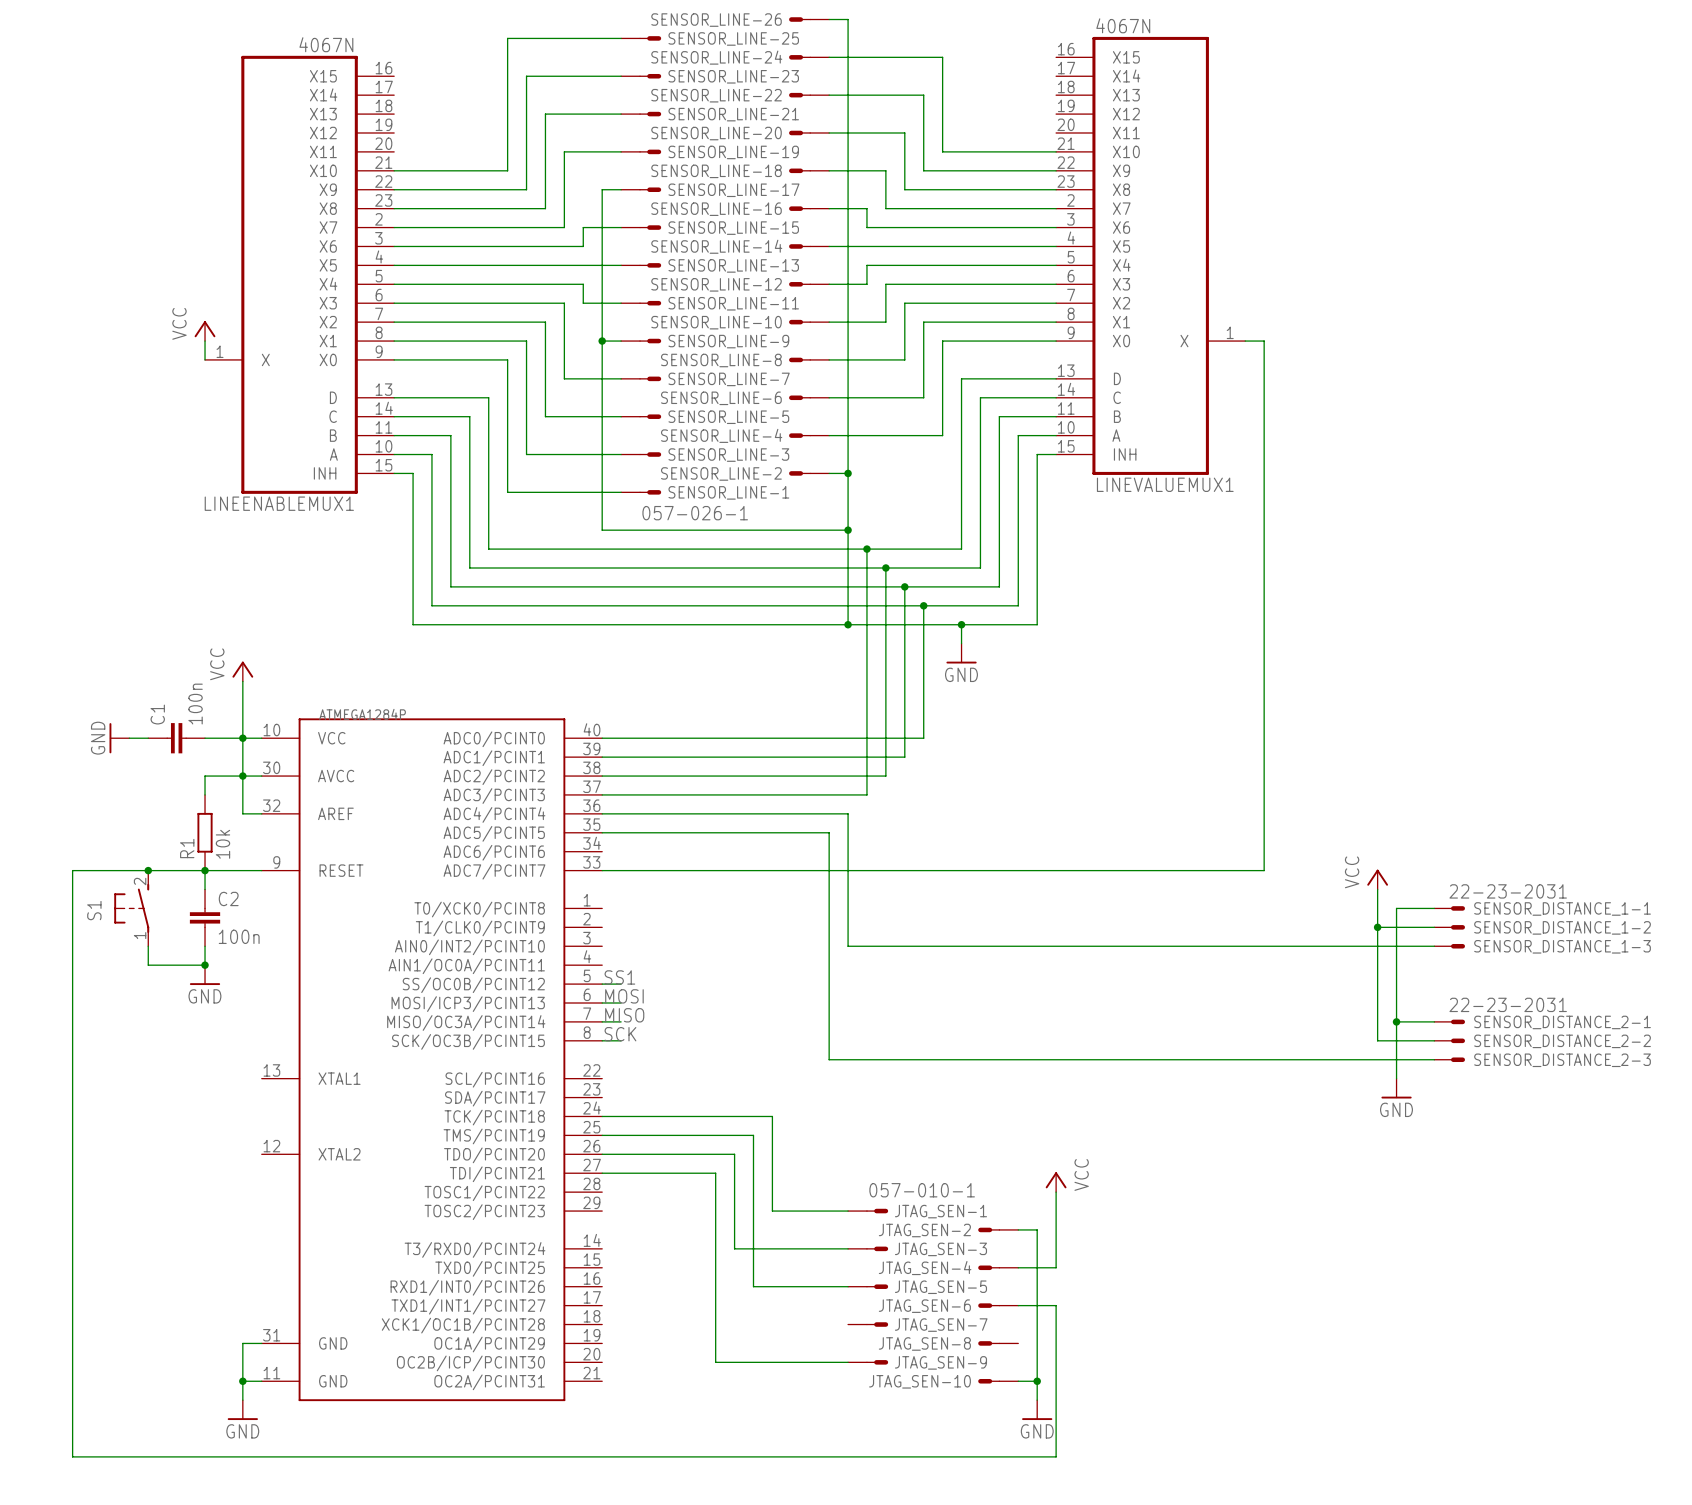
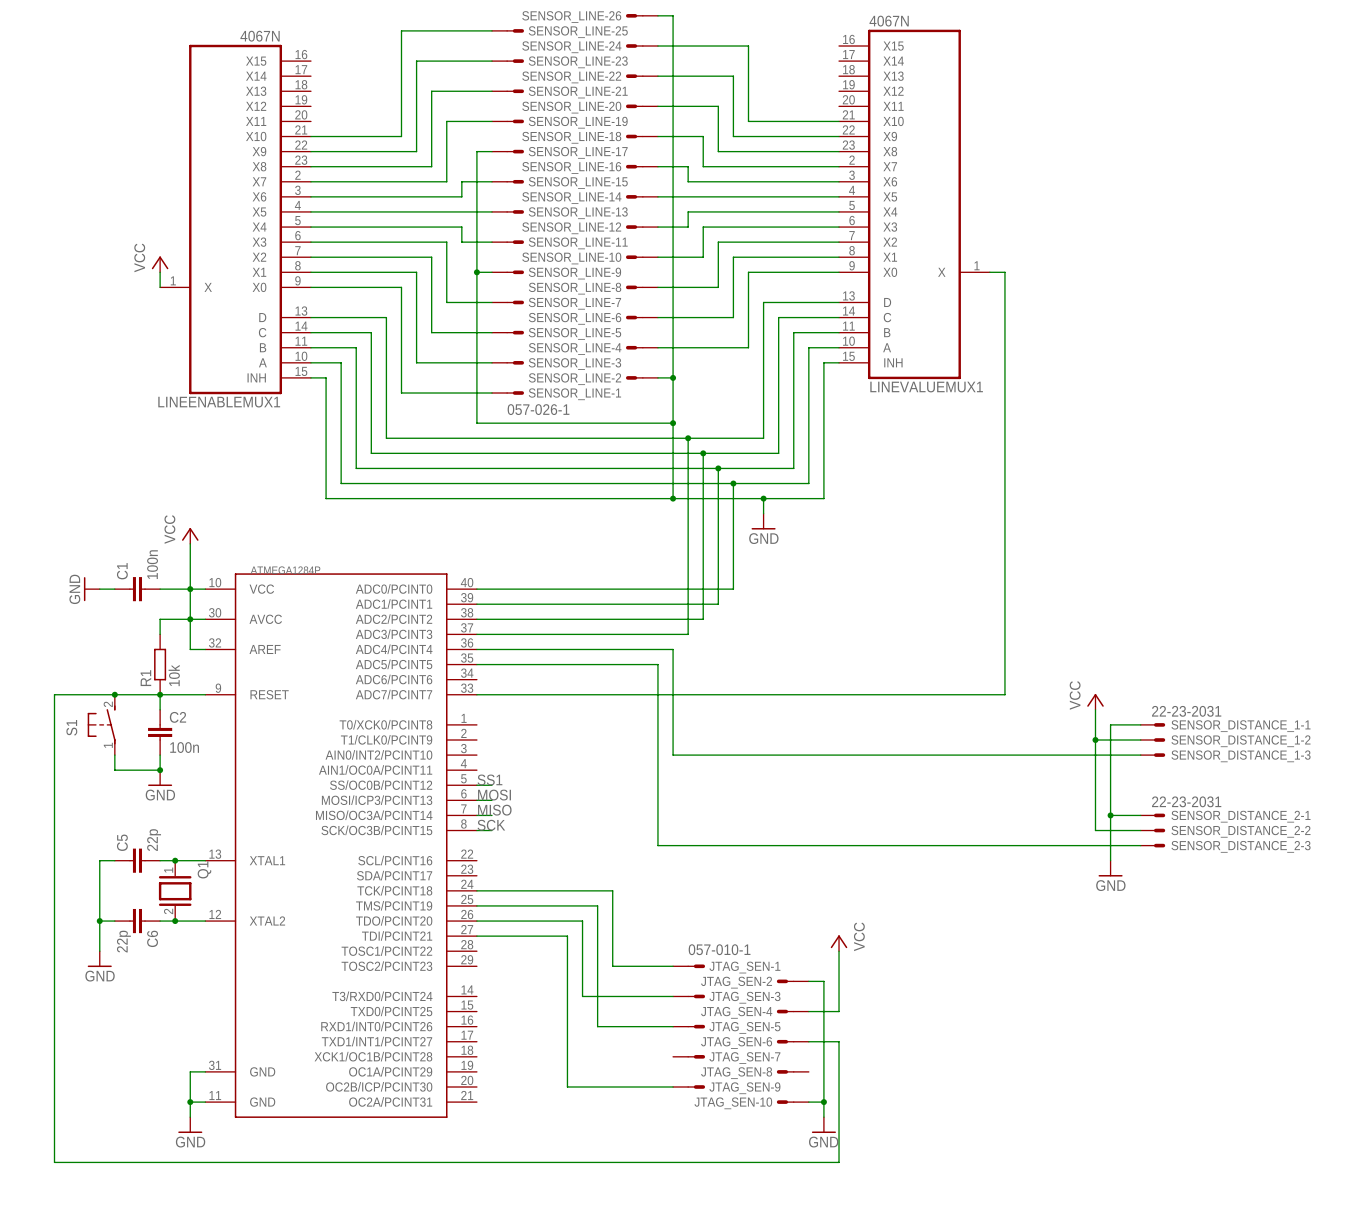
wire: none -> (114, 860) (99, 860) (99, 951)
C5: none -> 22p (137, 860)
wire: none -> (160, 860) (205, 860)
junction: none -> (175, 860)
Q1: none -> (175, 890)
wire: none -> (99, 921) (114, 921)
junction: none -> (99, 921)
C6: none -> 22p (137, 921)
wire: none -> (160, 921) (205, 921)
junction: none -> (175, 921)
power symbol: none -> GND (99, 959)

